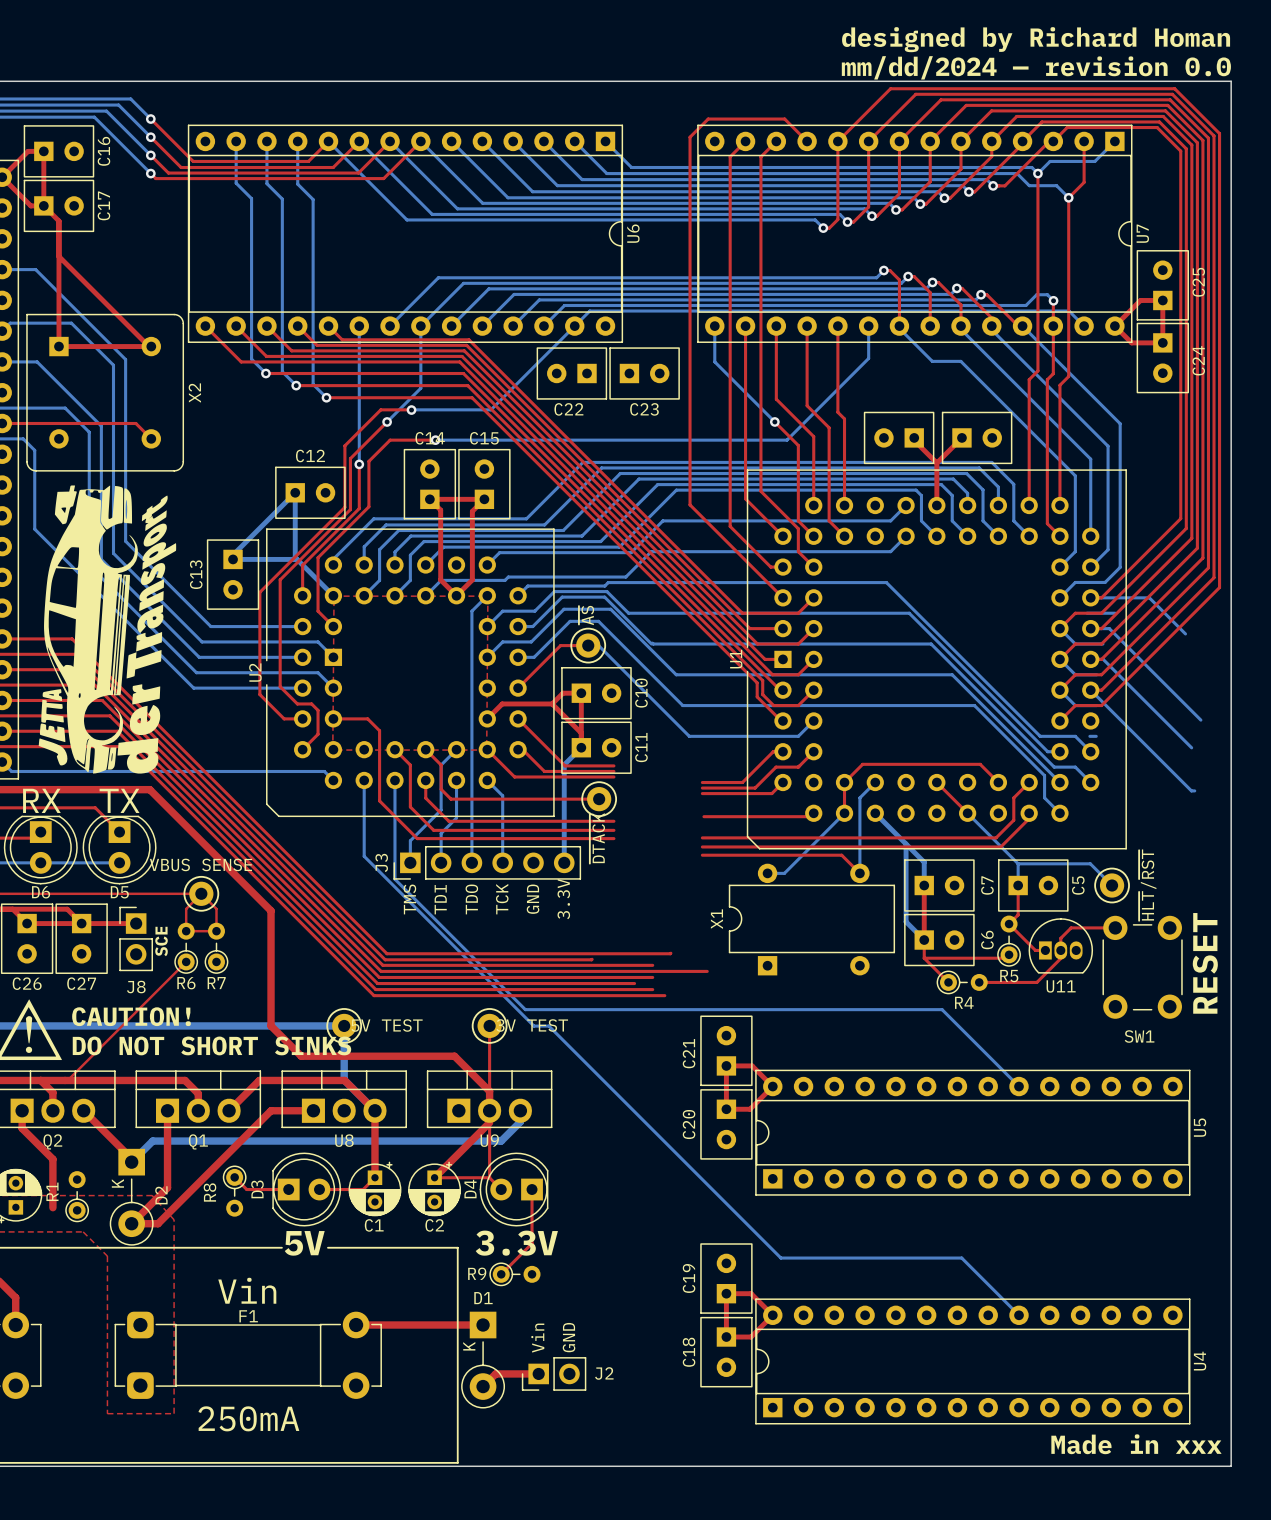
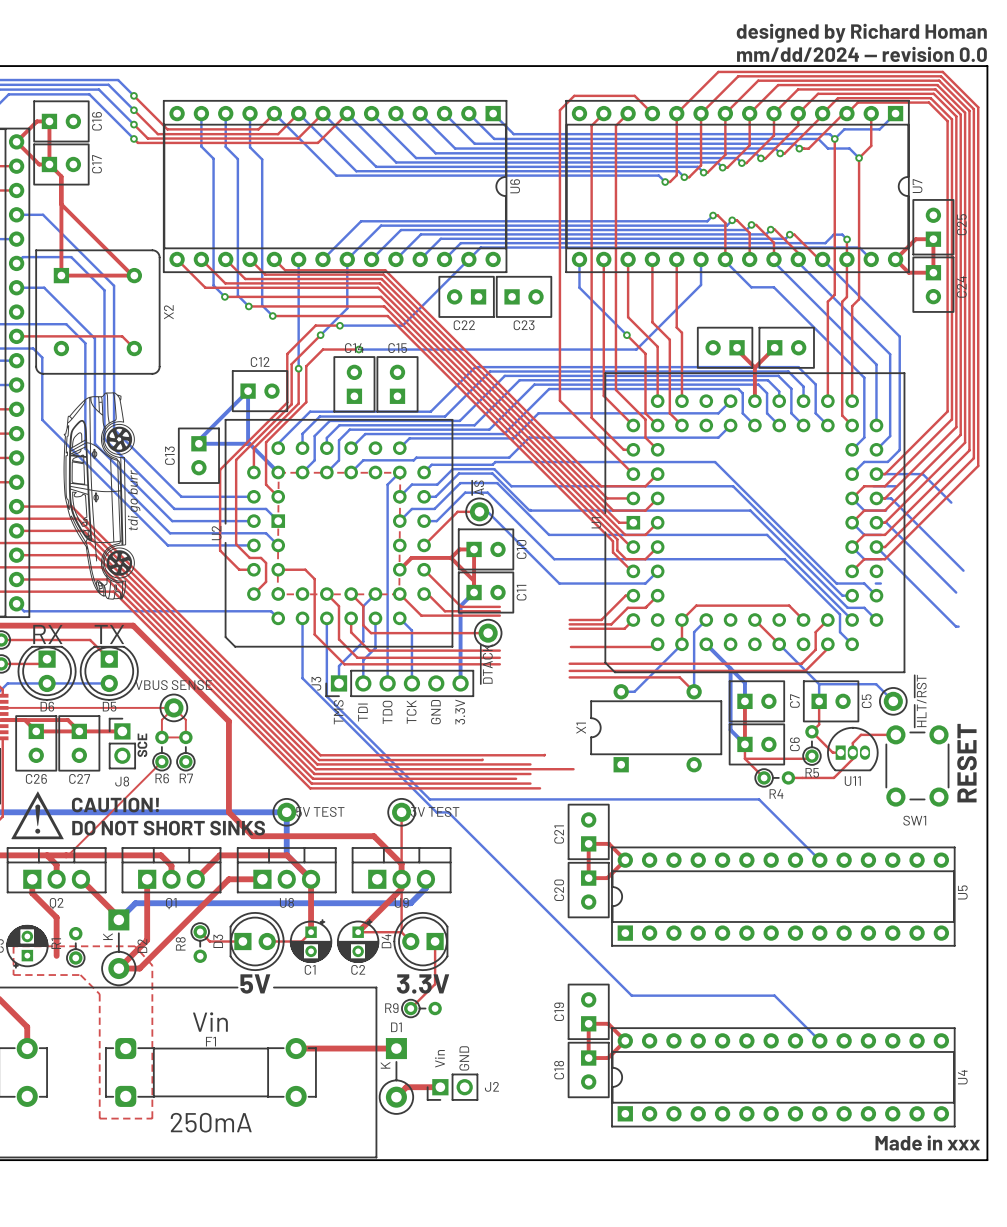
drawing: none -> [63, 392, 135, 600]
drawing: [117, 495, 177, 774] -> none
top track: (429, 499) (484, 499) (472, 511) (472, 579) (456, 595) (440, 579) (440, 510) (429, 499) -> none
part: (88, 629) -> none

